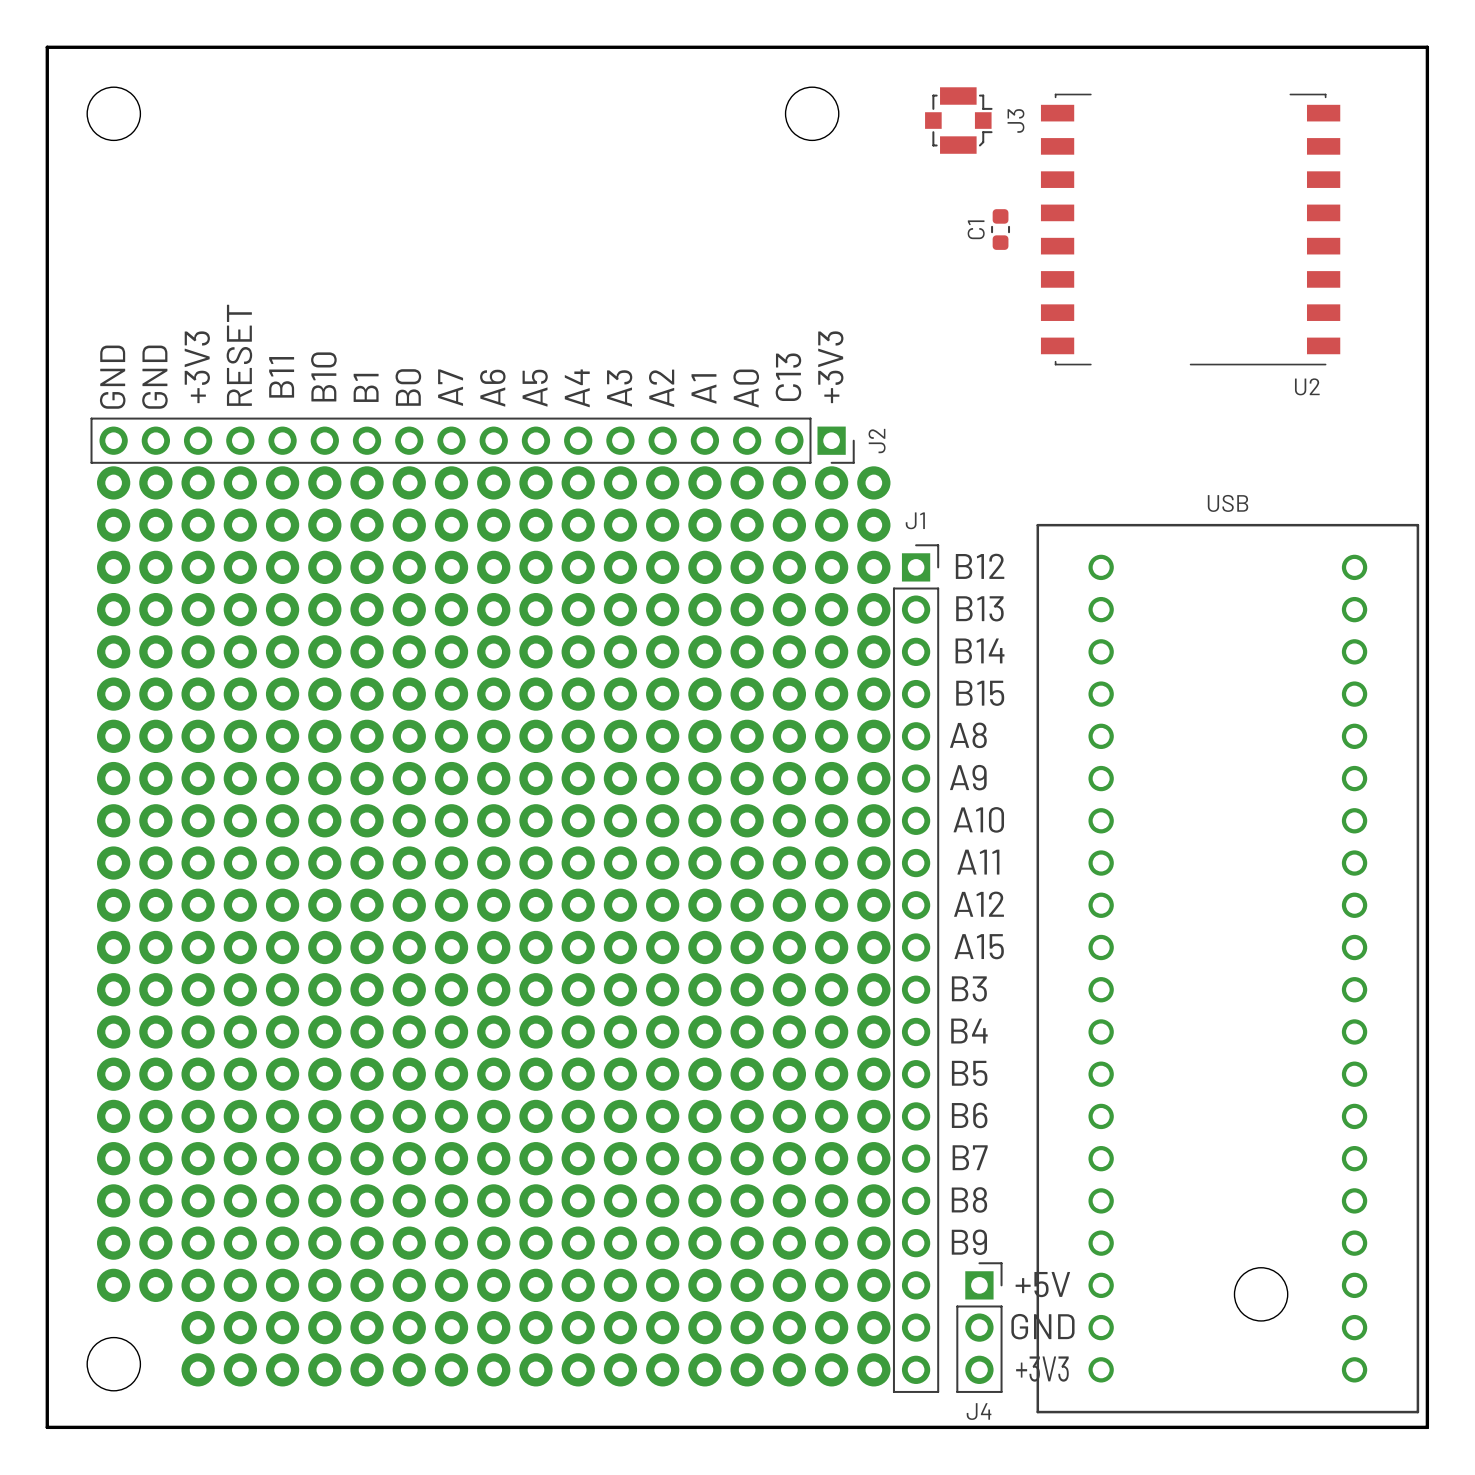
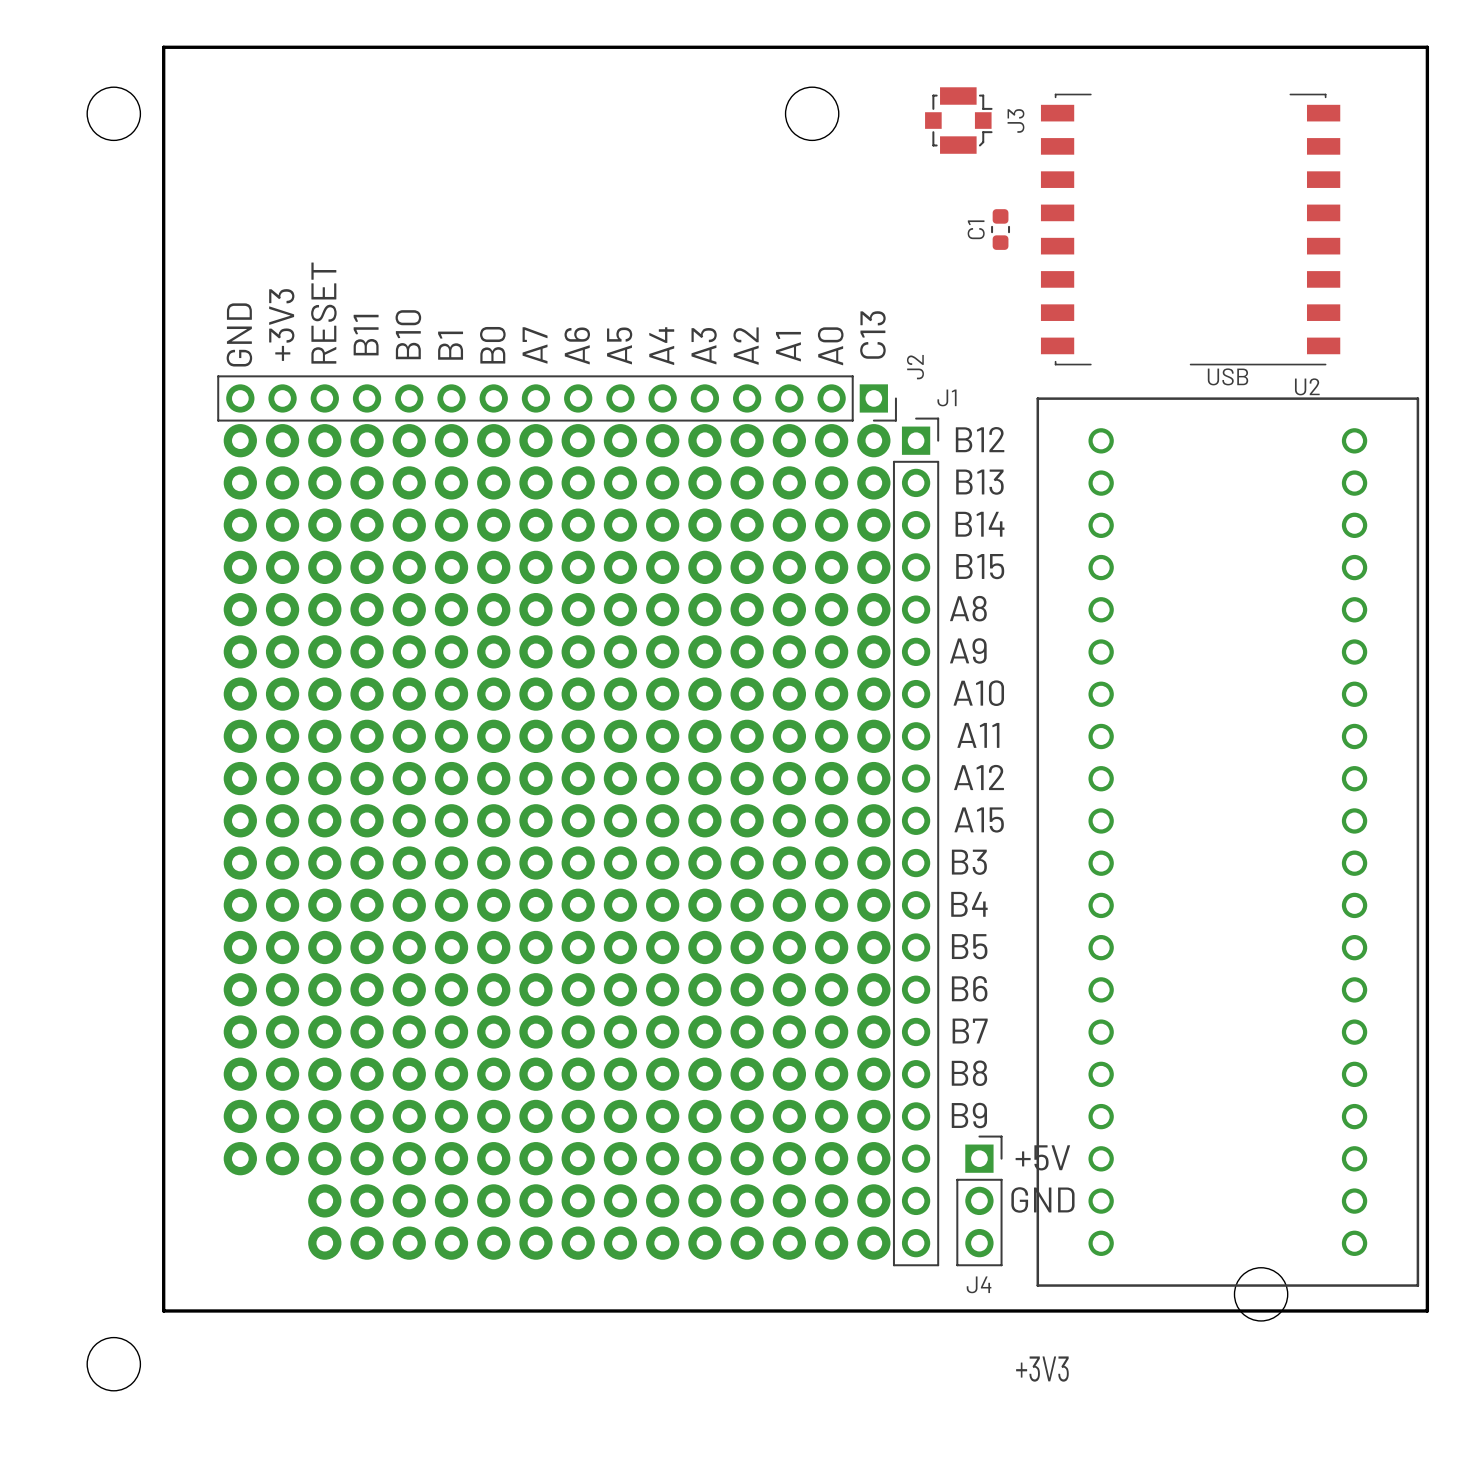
board edge: (163, 47) (47, 47) (47, 1427) (1427, 1427) (1427, 1310) -> (163, 47) (163, 1310) (1427, 1310)
text: none -> GND (239, 334)
text position: RESET (239, 355) -> RESET (323, 313)
text position: +3V3 (197, 367) -> +3V3 (281, 325)
text: +3V3 (830, 367) -> none
text position: B10 (323, 376) -> B10 (408, 334)
text: GND (112, 377) -> none
text: GND (154, 377) -> none
text position: B11 (281, 377) -> B11 (366, 335)
text position: C13 (788, 377) -> C13 (872, 334)
text position: B1 (366, 387) -> B1 (450, 345)
text position: B0 (408, 387) -> B0 (492, 345)
text position: A7 (450, 387) -> A7 (535, 345)
text position: A6 (492, 388) -> A6 (577, 345)
text position: A5 (535, 388) -> A5 (619, 345)
text position: A4 (577, 388) -> A4 (661, 346)
text position: A3 (619, 388) -> A3 (704, 346)
text position: A2 (661, 388) -> A2 (746, 346)
text position: A1 (703, 388) -> A1 (788, 346)
text position: A0 (746, 388) -> A0 (830, 346)
J2 footprint: [90, 417, 855, 464] -> [217, 375, 897, 422]
text: none -> B12 (980, 439)
J2 name position: J2 (877, 441) -> J2 (915, 367)
J1 name position: J1 (915, 520) -> J1 (946, 397)
text: B12 (980, 566) -> B15 (980, 566)
text position: B13 (979, 608) -> B13 (979, 482)
text position: B14 (980, 650) -> B14 (980, 524)
text: B15 (980, 693) -> A10 (978, 693)
text position: A8 (968, 735) -> A8 (968, 608)
text position: A9 (968, 777) -> A9 (968, 650)
text: A10 (978, 819) -> A15 (979, 819)
part: none -> (557, 841)
text: none -> B3 (969, 862)
text position: A11 (978, 862) -> A11 (978, 735)
text: none -> B4 (969, 904)
text position: A12 (978, 904) -> A12 (978, 777)
part: (493, 926) -> none
text: A15 (979, 946) -> B5 (969, 946)
J1 position: (916, 968) -> (916, 841)
part position: (1227, 968) -> (1227, 842)
text: B3 (969, 988) -> B6 (969, 988)
text: B4 (969, 1031) -> B7 (970, 1031)
text: B5 (969, 1073) -> B8 (969, 1073)
text: B6 (969, 1115) -> B9 (969, 1115)
text: B7 (970, 1157) -> none
text: B8 (969, 1199) -> none
text: B9 (969, 1242) -> none
text position: +5V (1042, 1284) -> +5V (1042, 1157)
text position: GND (1042, 1326) -> GND (1042, 1199)
J4 position: (979, 1327) -> (979, 1200)

